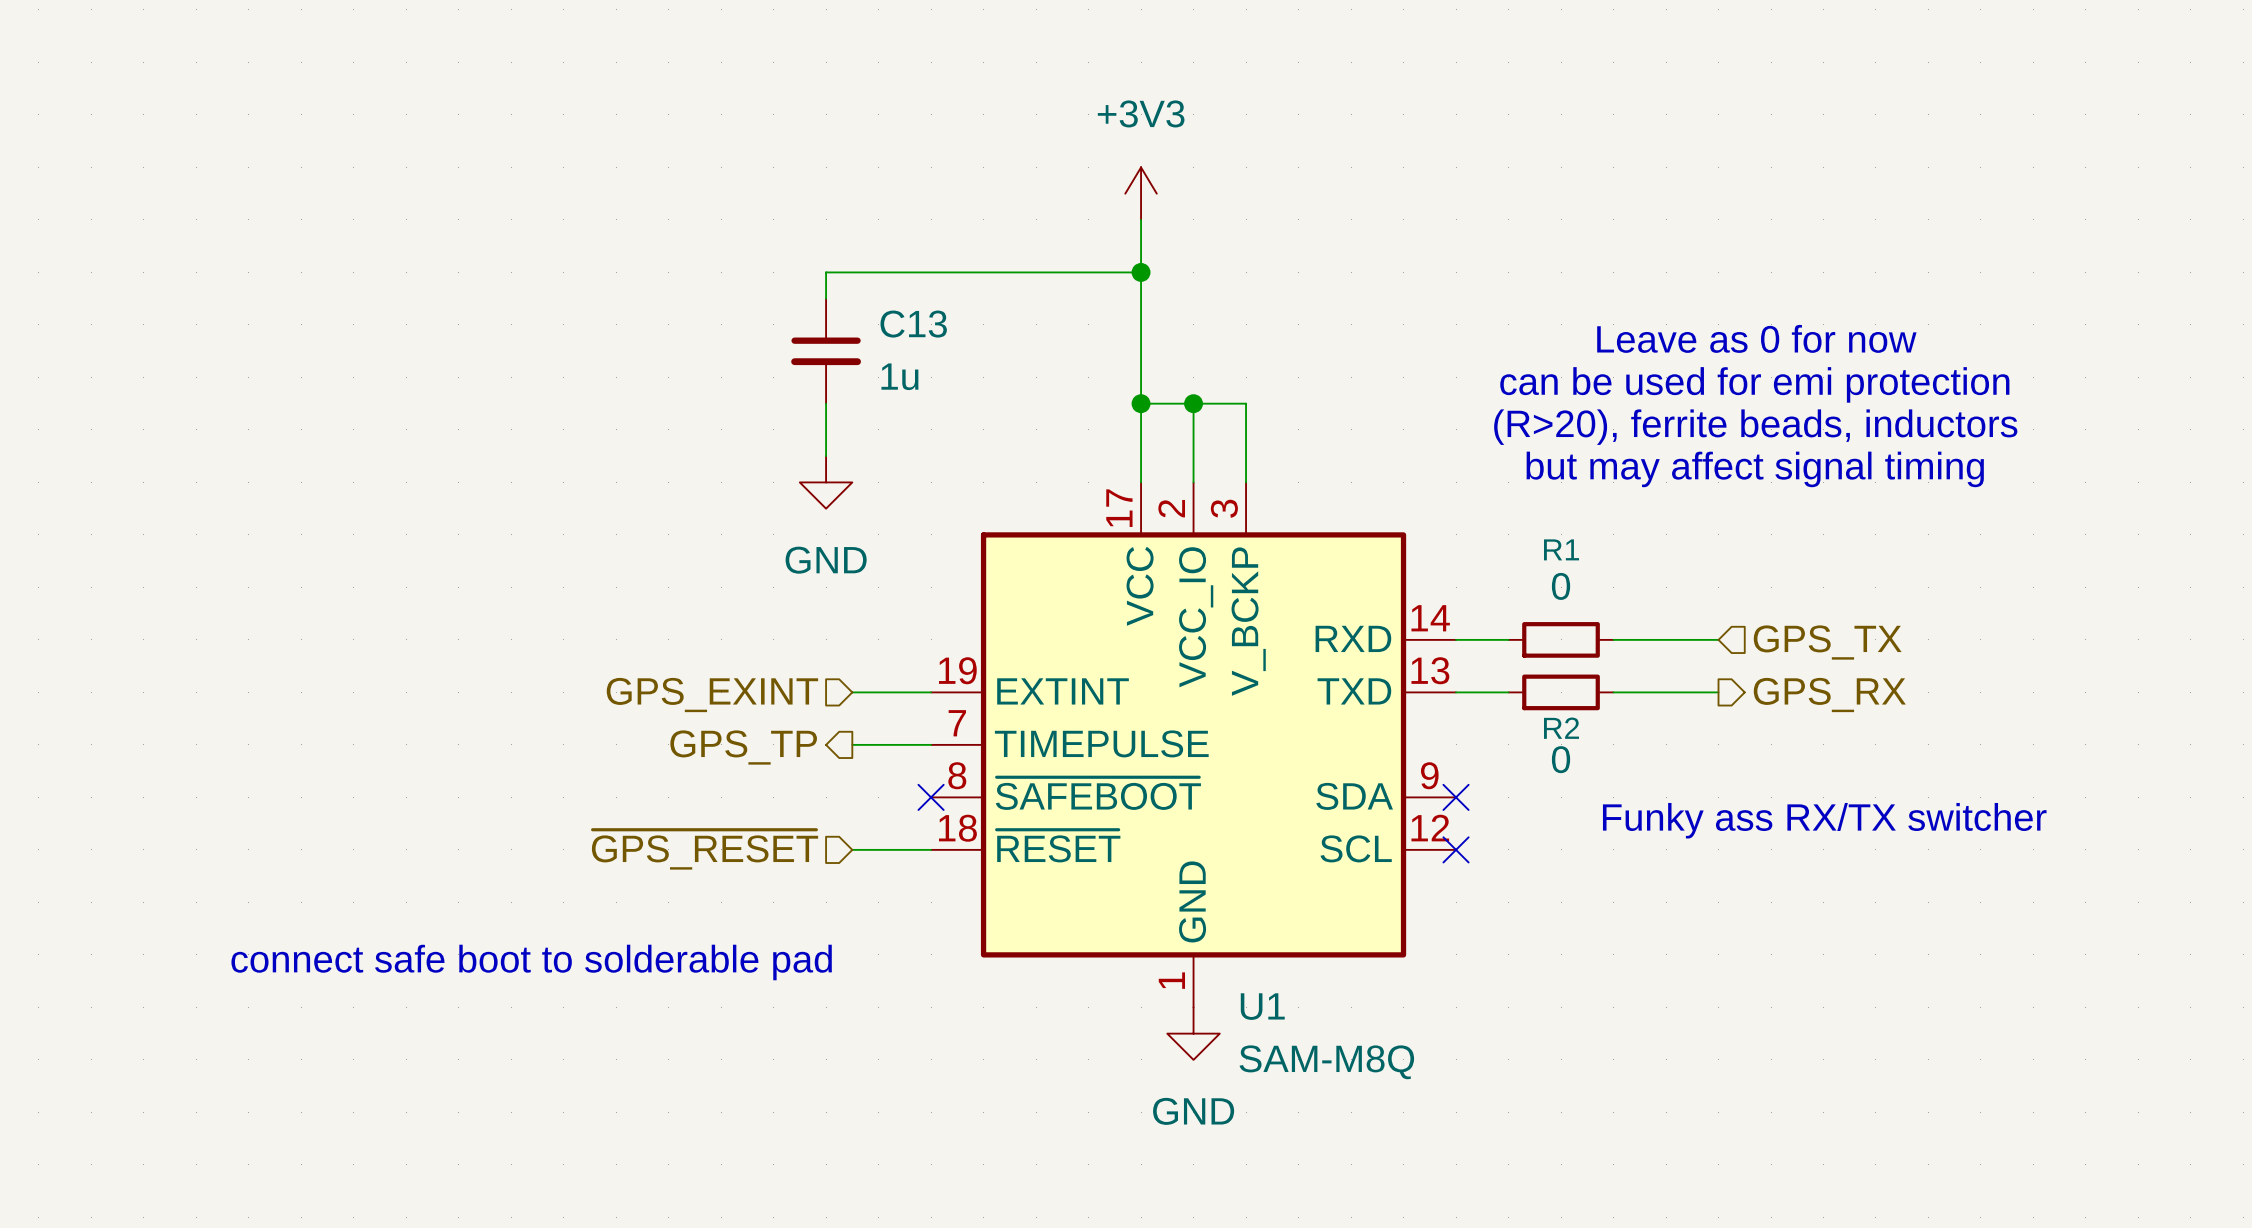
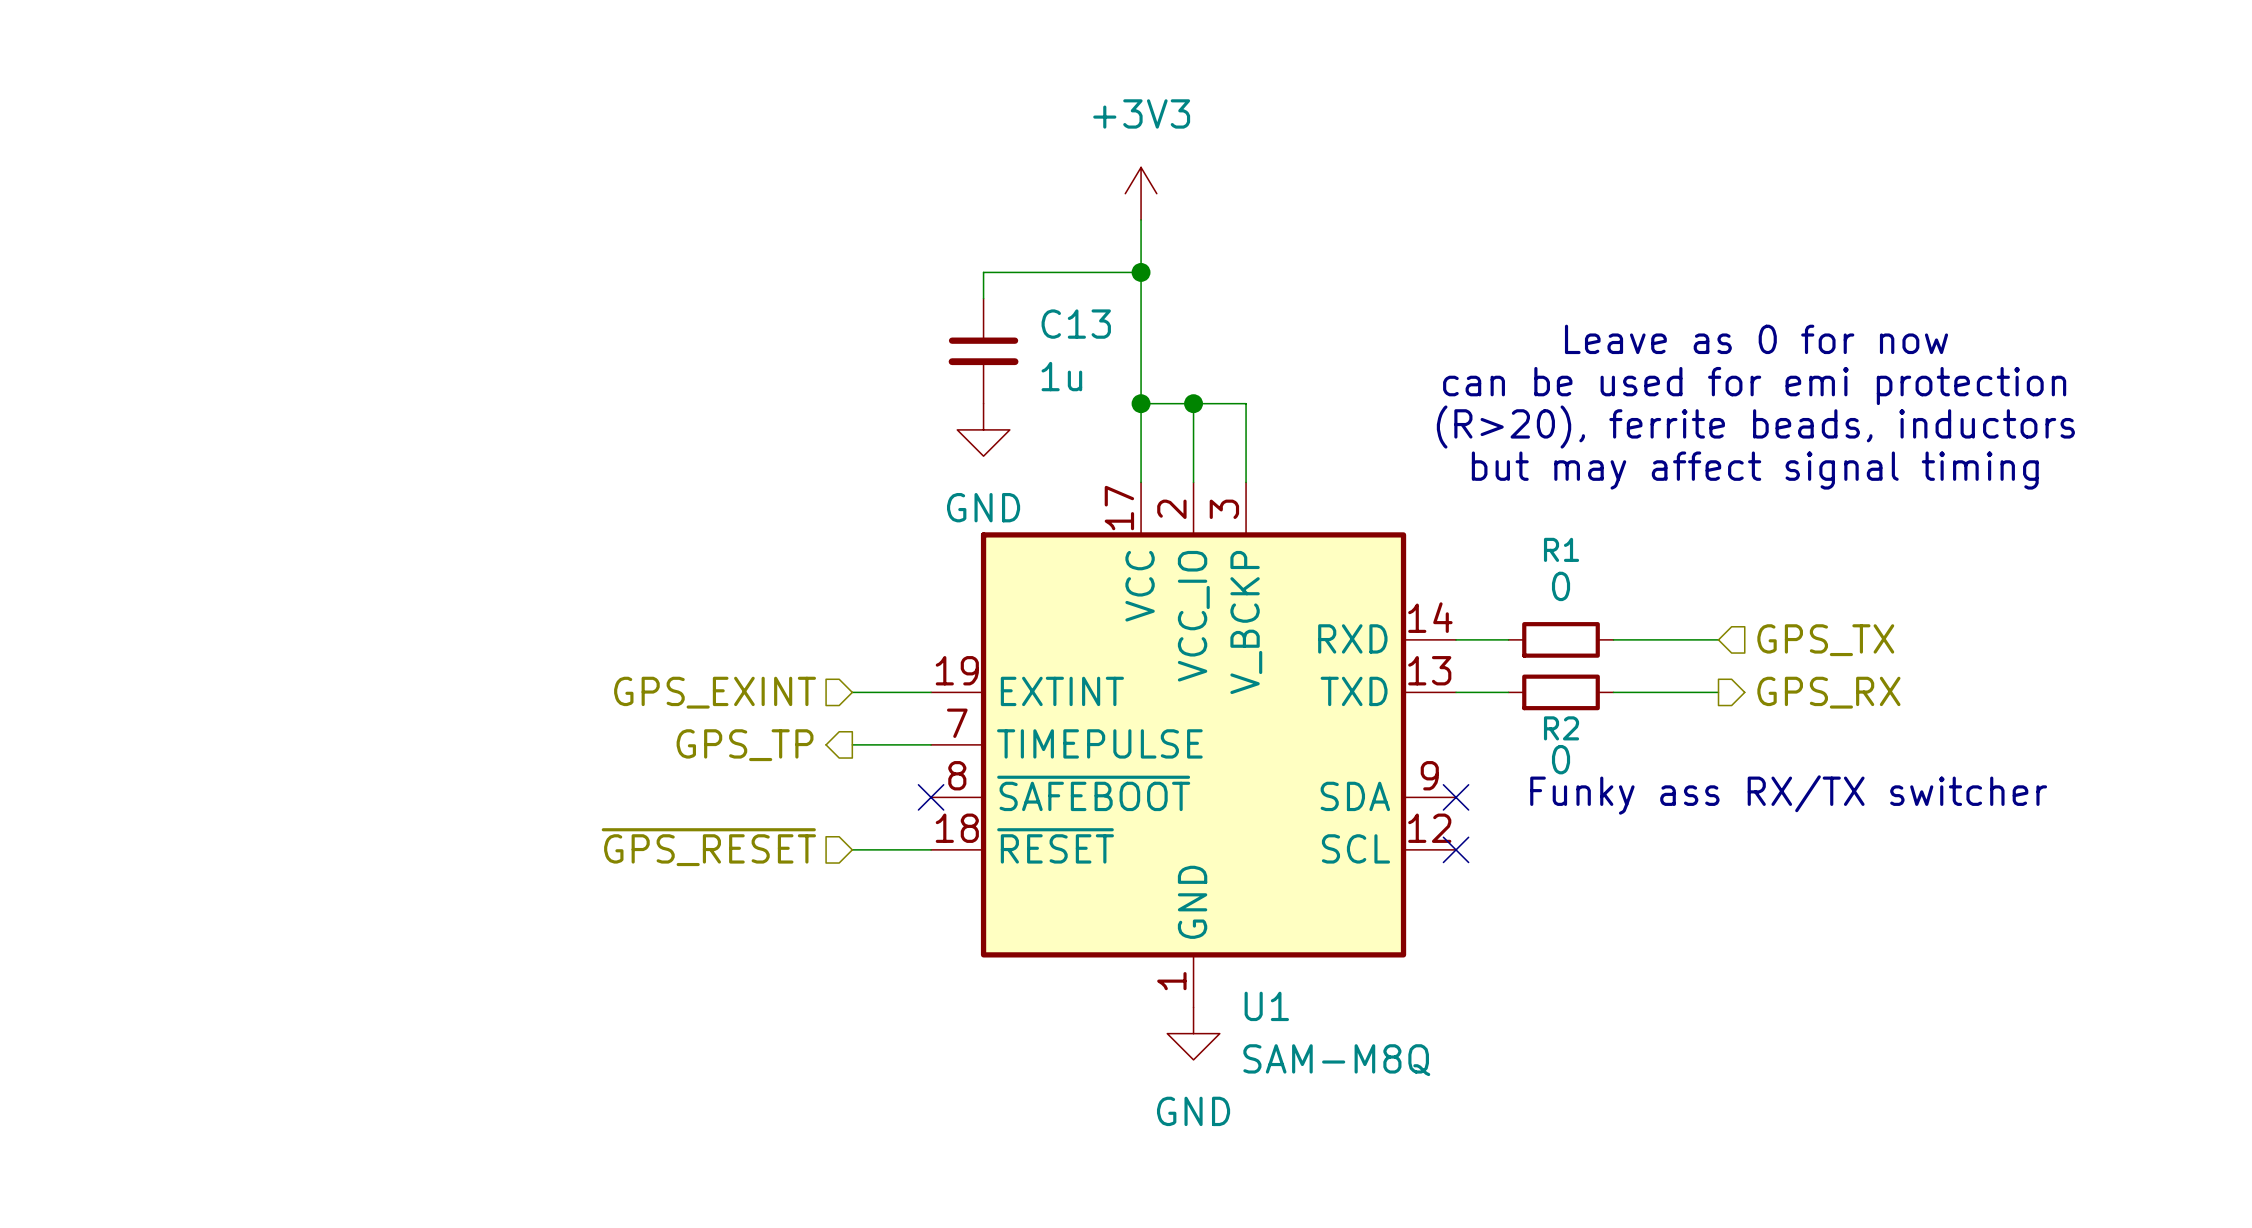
wire: (983, 272) (826, 272) (826, 298) -> (983, 272) (983, 298)
C13 position: (826, 351) -> (983, 351)
wire: (826, 403) (826, 456) -> none
power symbol position: GND (826, 482) -> GND (983, 429)
text position: Funky ass RX/TX switcher (1824, 820) -> Funky ass RX/TX switcher (1788, 794)
text: connect safe boot to solderable pad (531, 962) -> none

